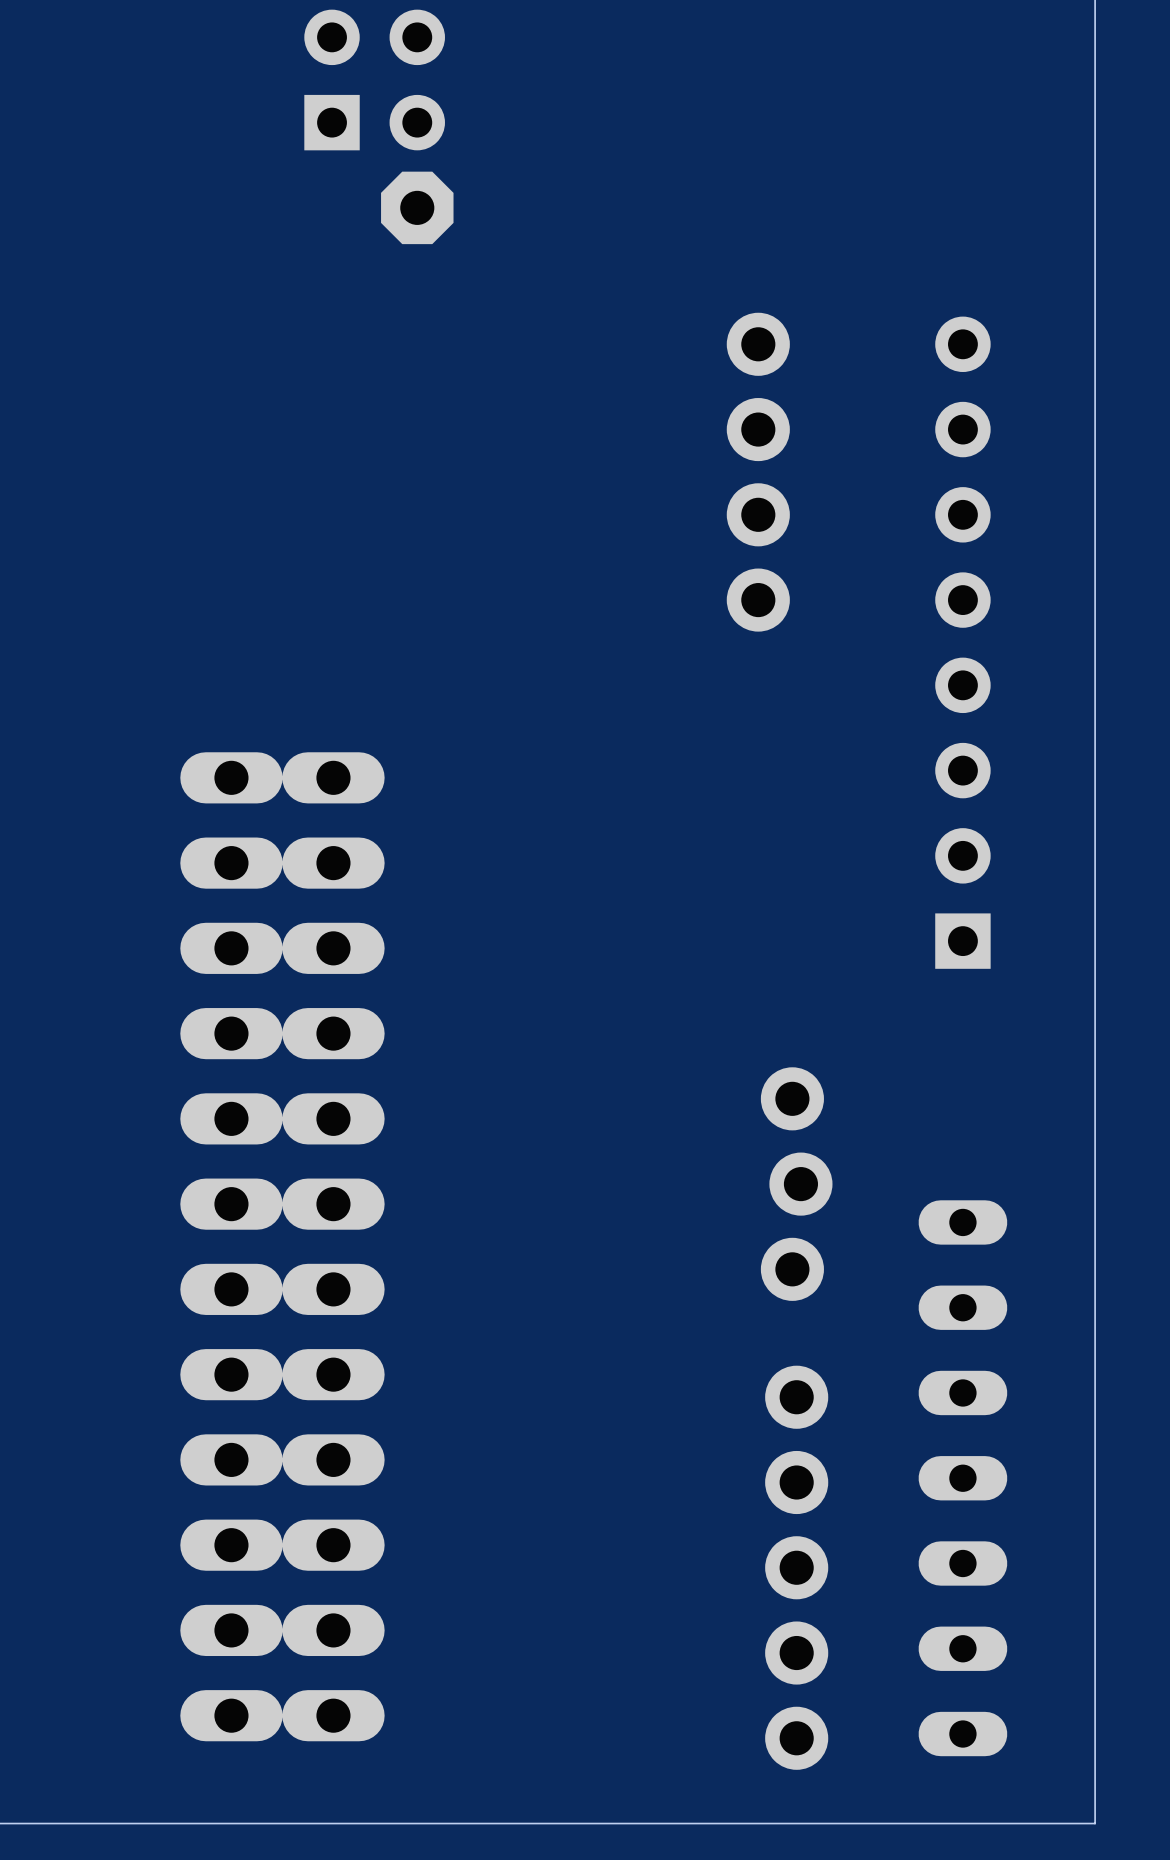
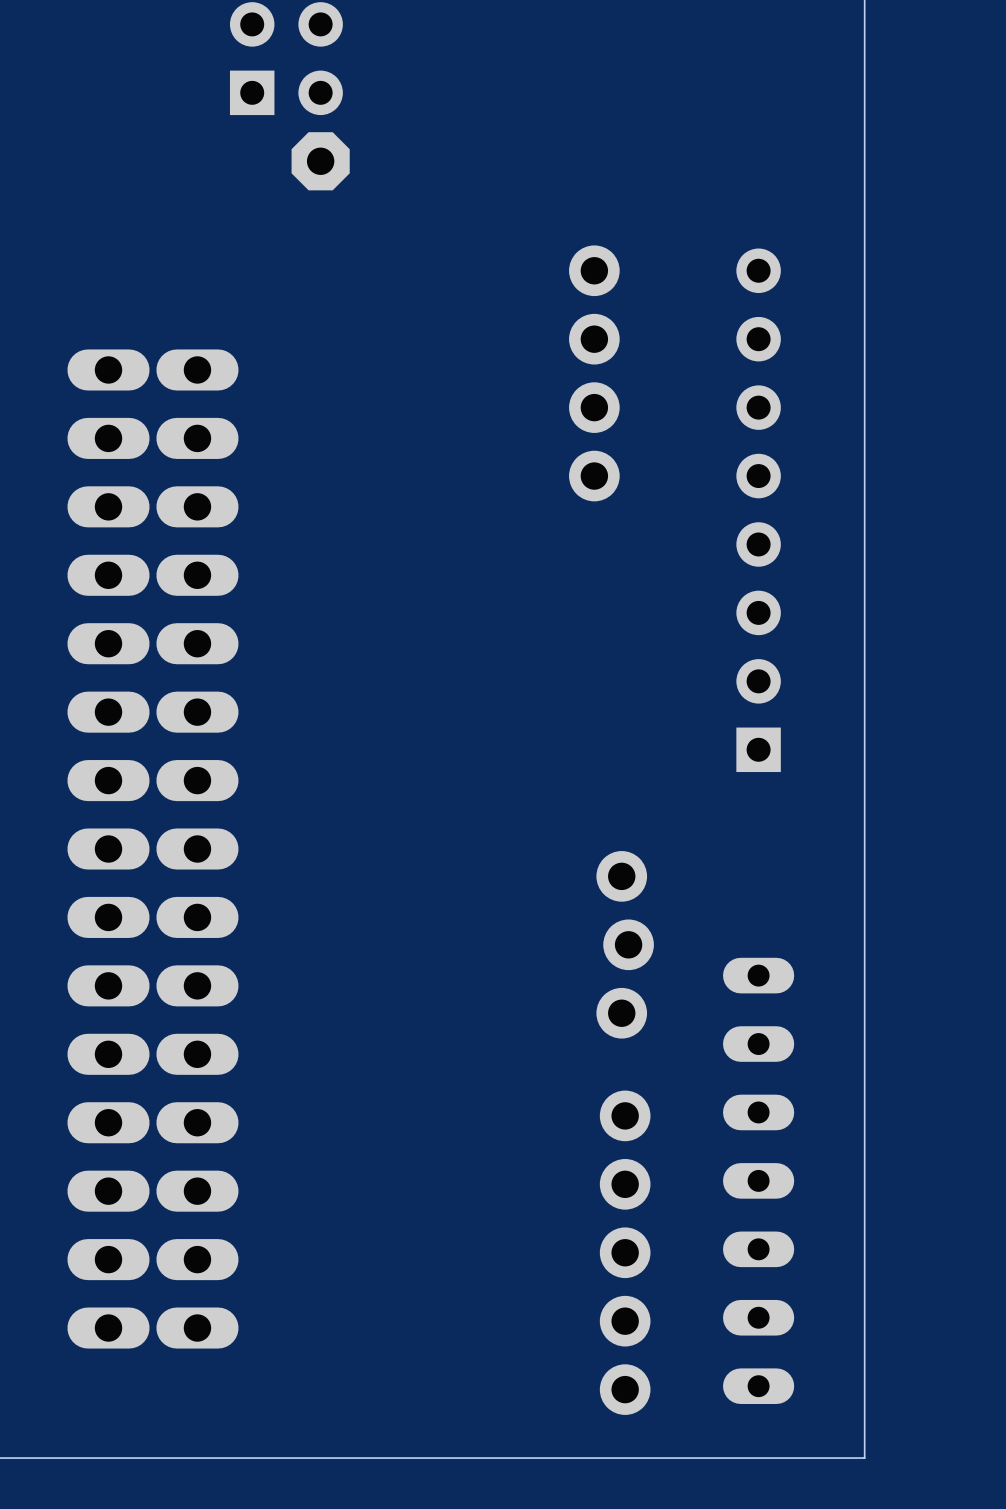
part: none -> (108, 849)
part: none -> (197, 849)
part: (231, 1246) -> none
part: (333, 1246) -> none

